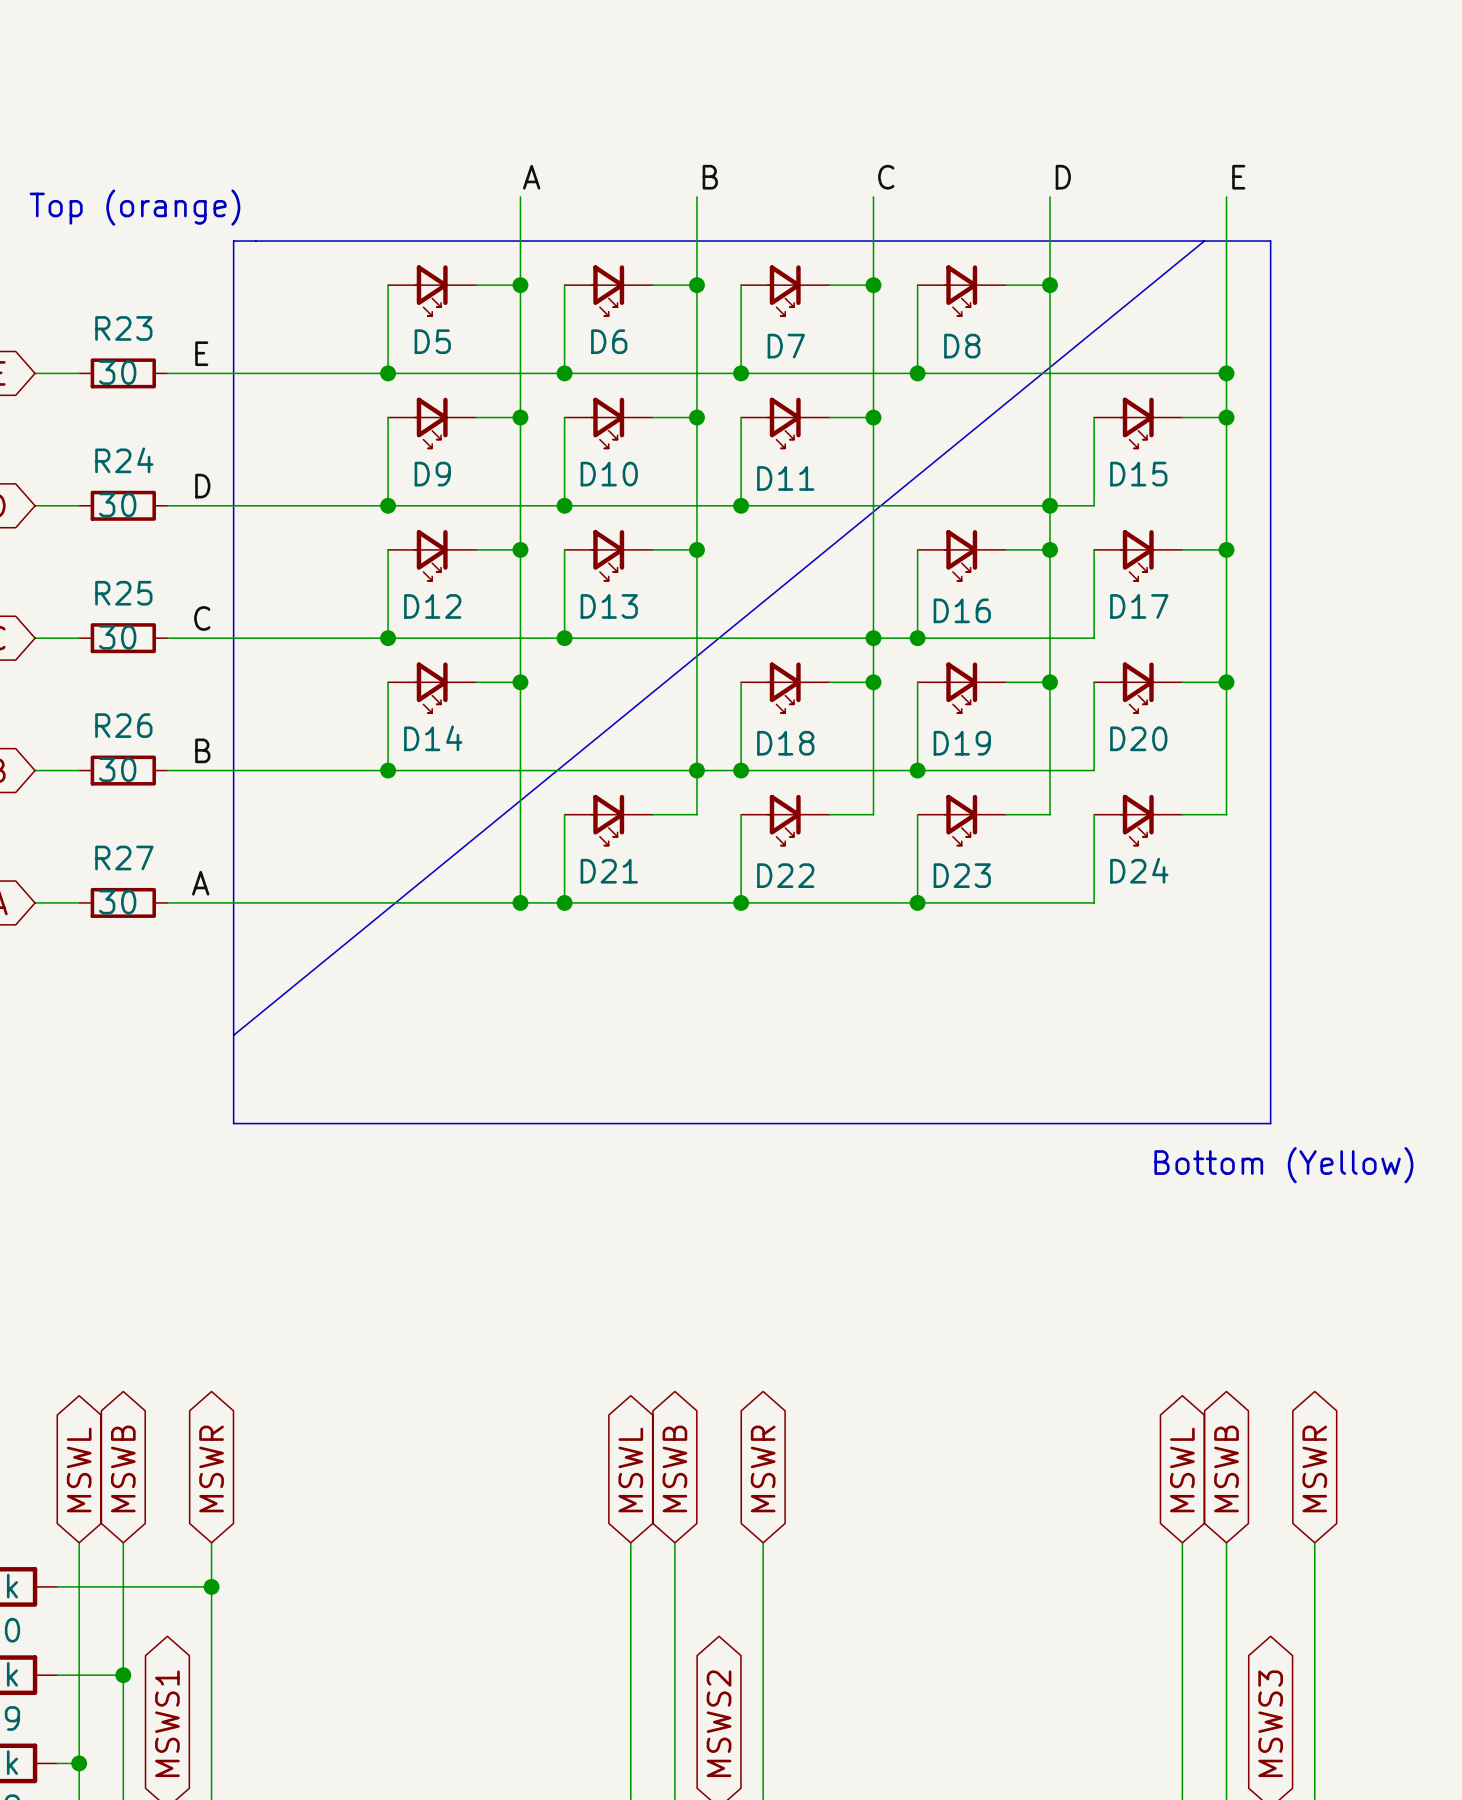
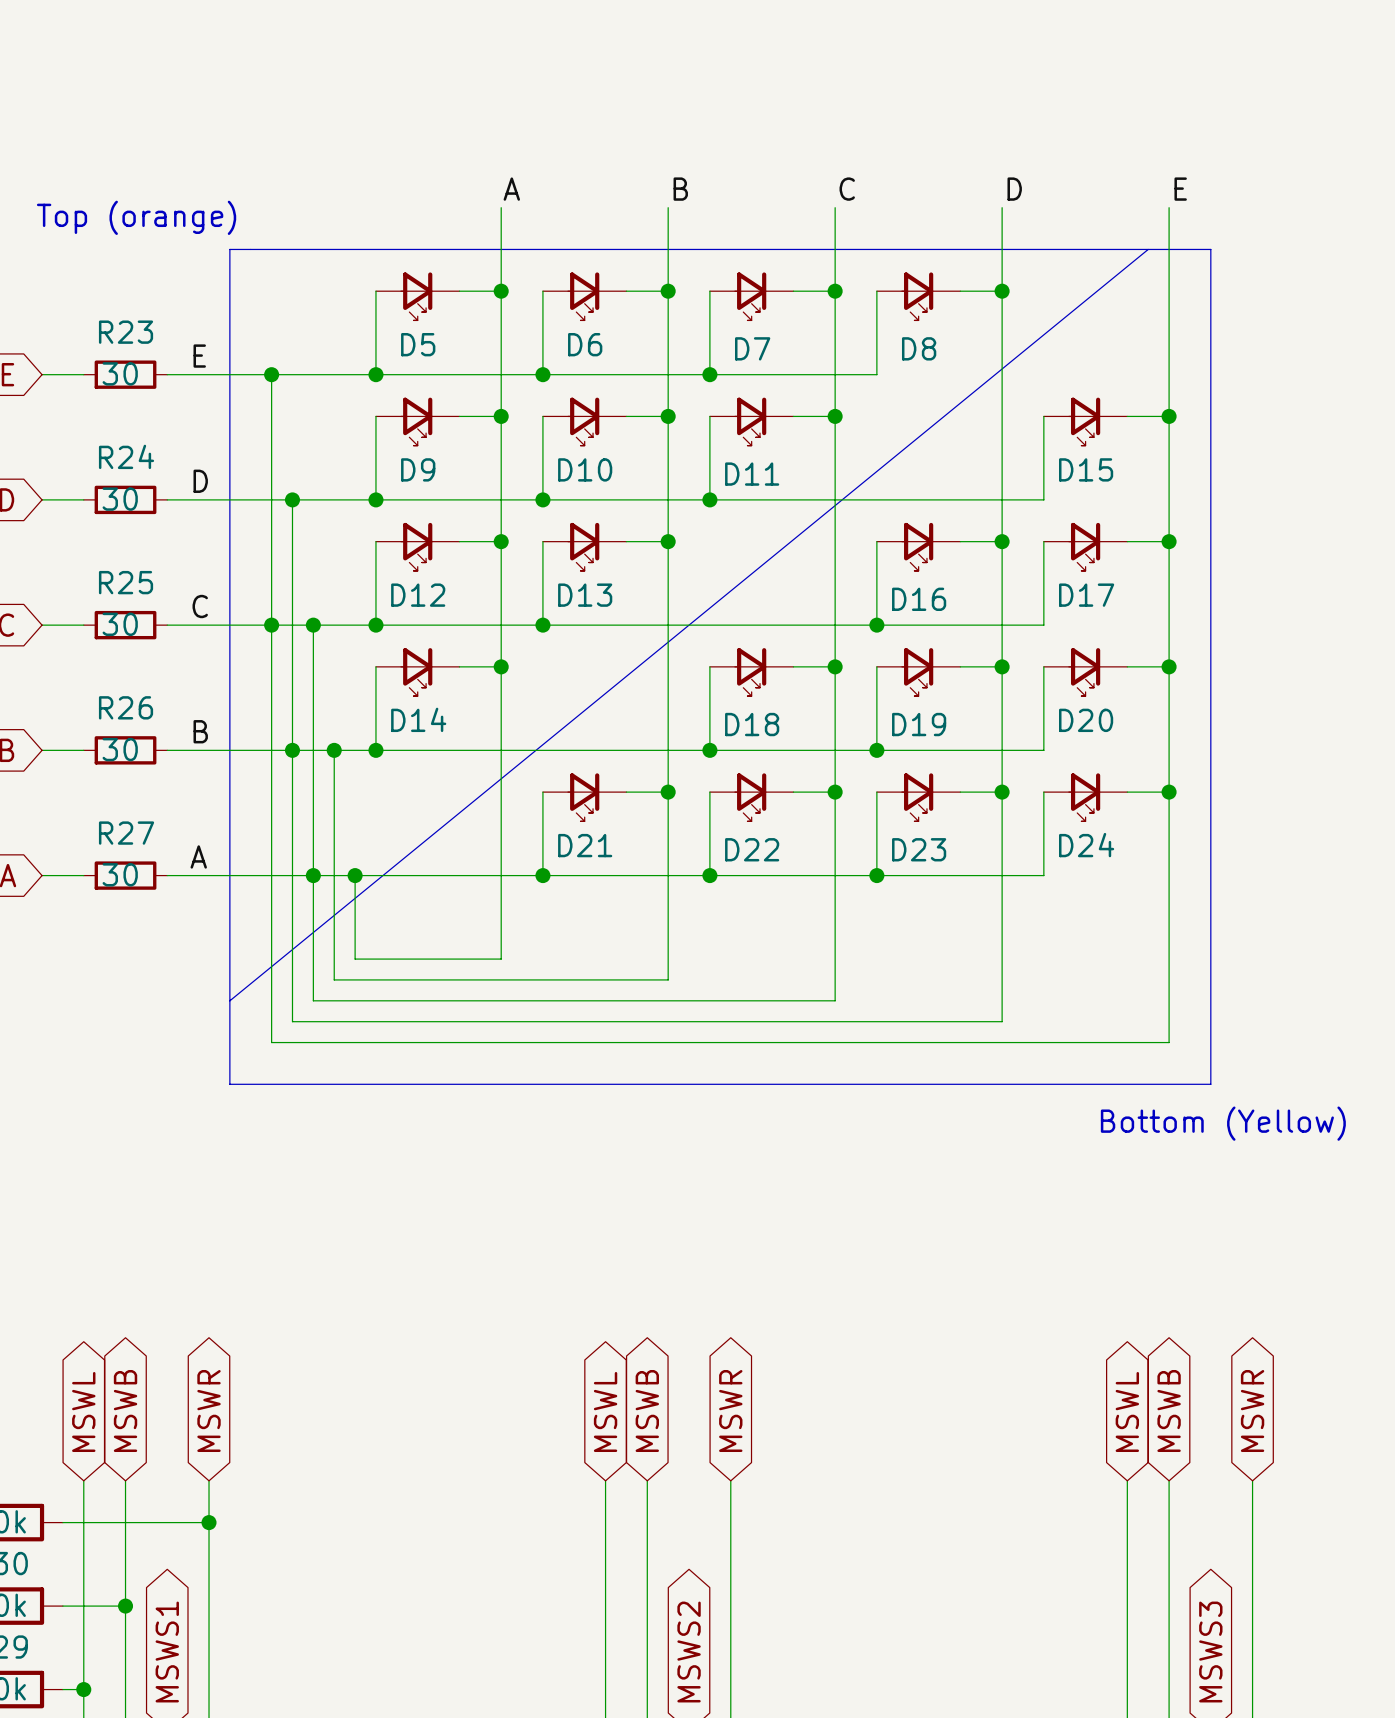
wire: none -> (271, 374) (271, 1042) (1169, 1042) (1169, 792)
junction: none -> (271, 374)
wire: (917, 373) (1226, 373) -> none
junction: (917, 373) -> none
junction: (1226, 373) -> none
wire: none -> (292, 499) (292, 1021) (1002, 1021) (1002, 792)
junction: none -> (292, 499)
junction: (1049, 505) -> none
junction: none -> (271, 625)
wire: none -> (313, 625) (313, 1000) (835, 1000) (835, 792)
junction: none -> (313, 625)
junction: (873, 638) -> none
junction: none -> (292, 750)
wire: none -> (334, 750) (334, 979) (668, 979) (668, 792)
junction: none -> (334, 750)
junction position: (696, 770) -> (668, 792)
junction: none -> (835, 792)
junction: none -> (1002, 792)
junction: none -> (1169, 792)
junction: none -> (313, 875)
wire: none -> (355, 875) (355, 959) (501, 959) (501, 875)
junction: none -> (355, 875)
junction: (520, 902) -> none

